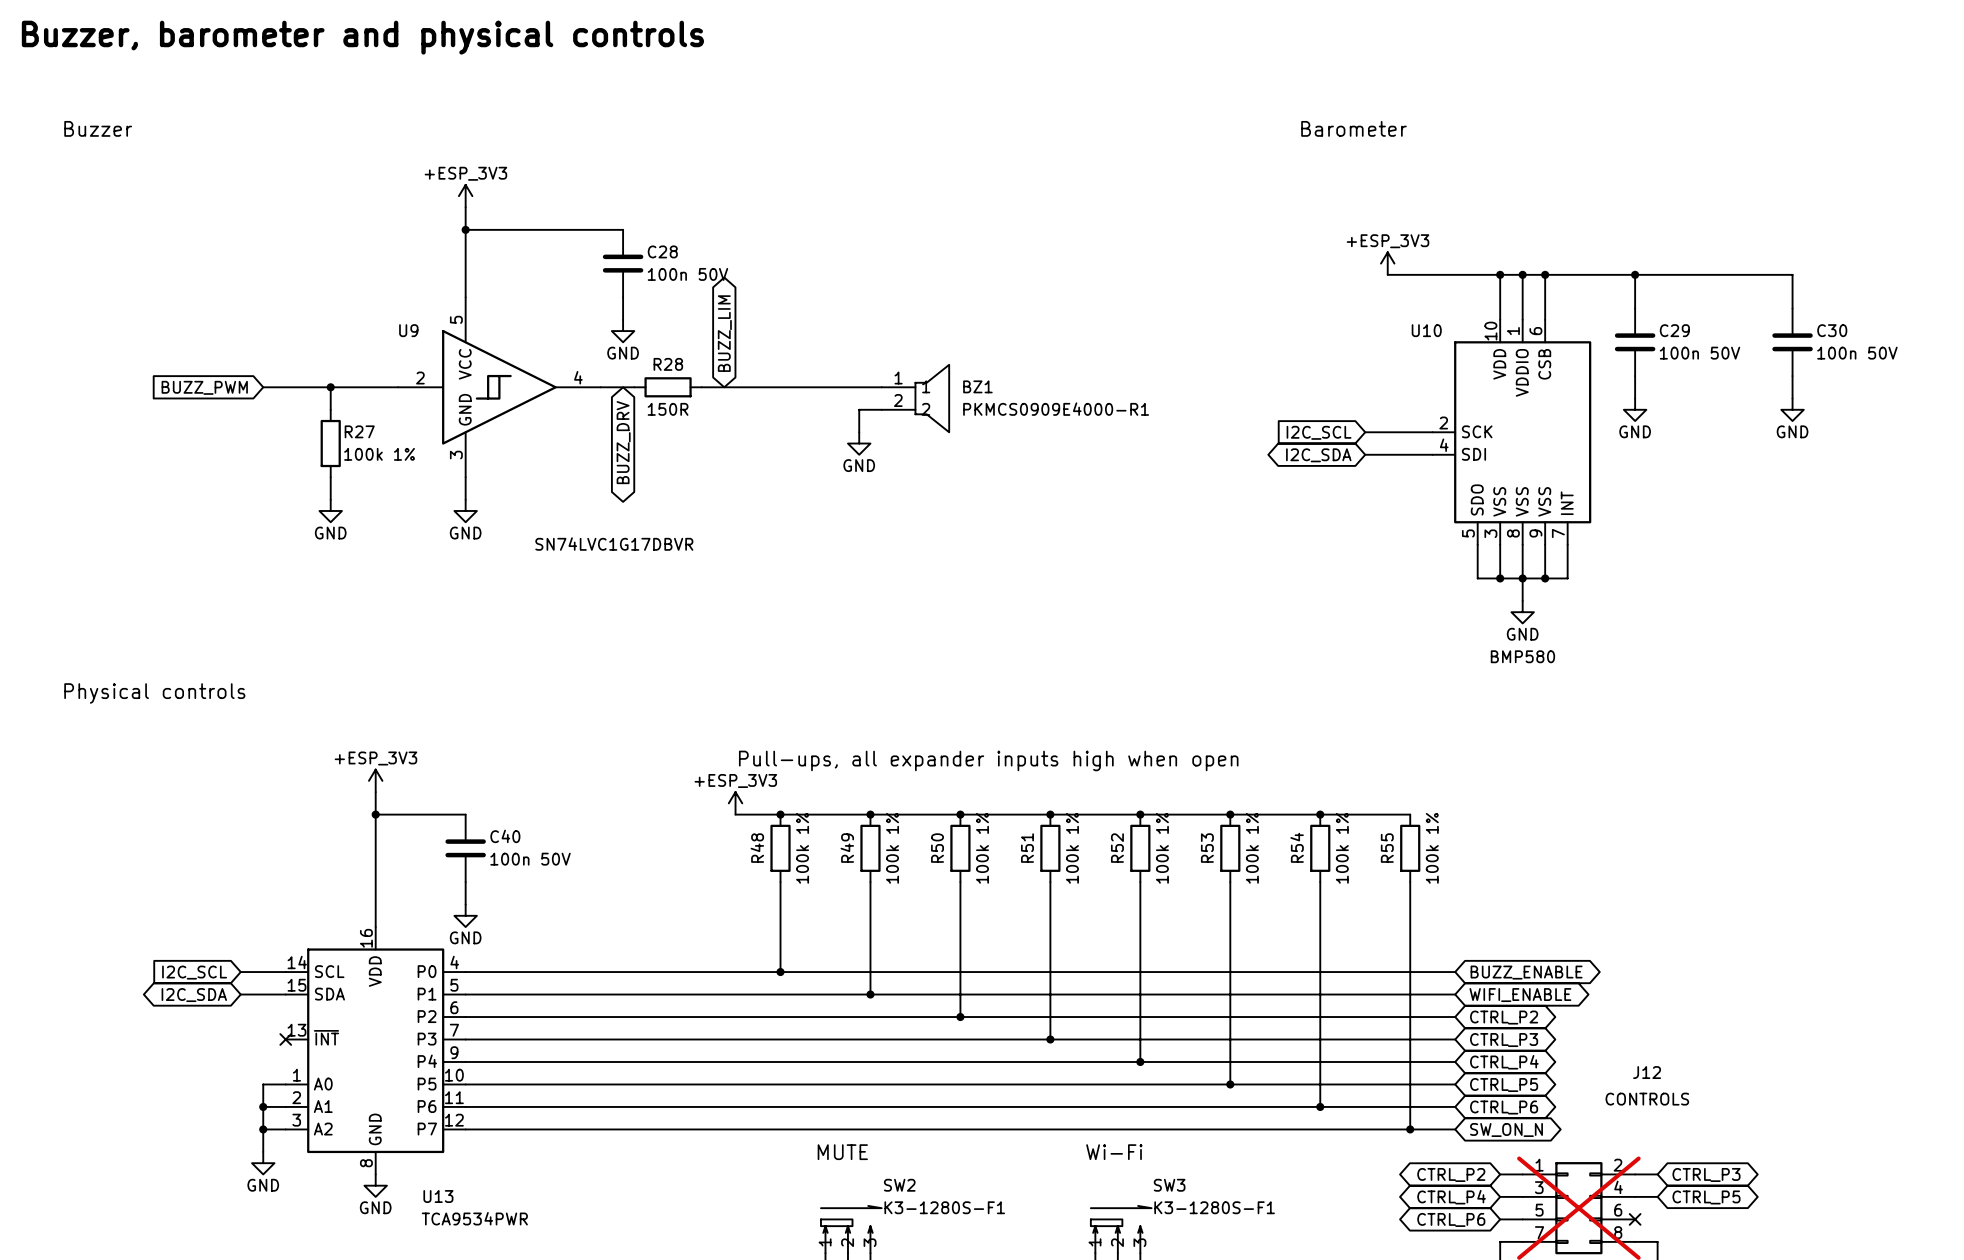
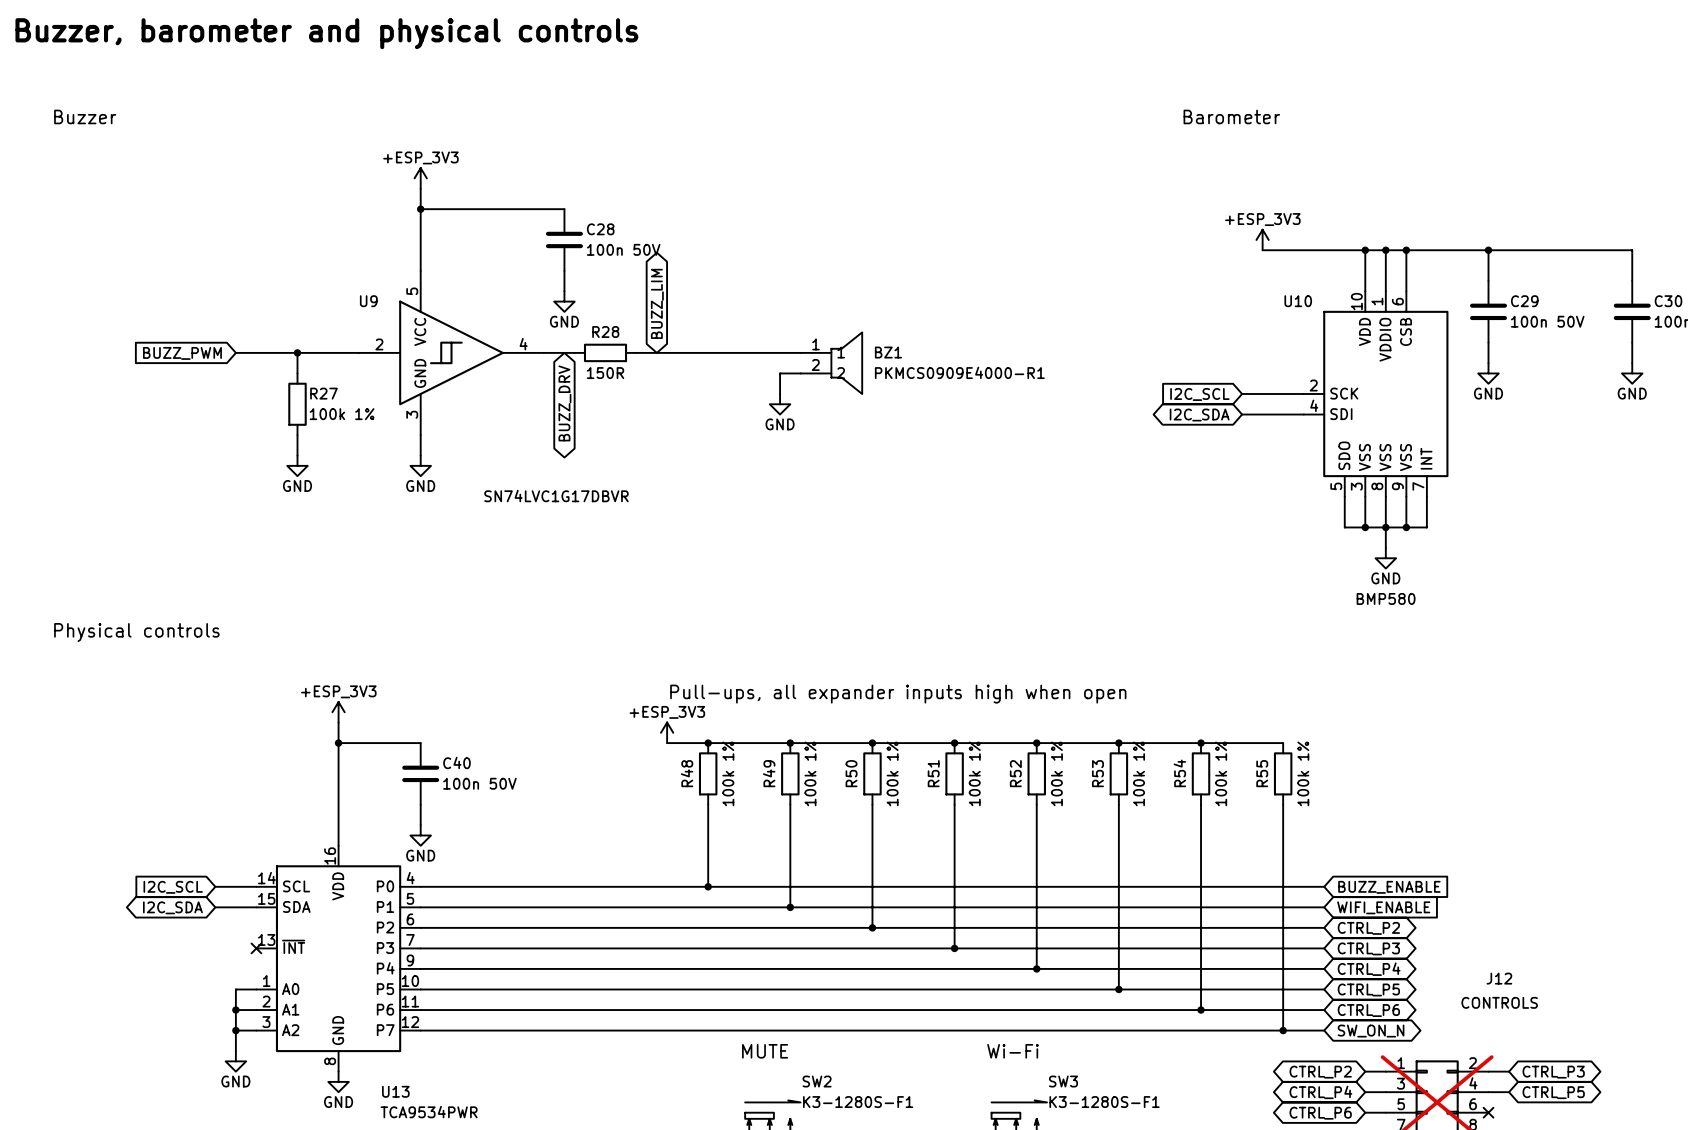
global label shape: bidirectional (1526, 972) -> input (1389, 887)
global label shape: bidirectional (1520, 995) -> input (1383, 907)

